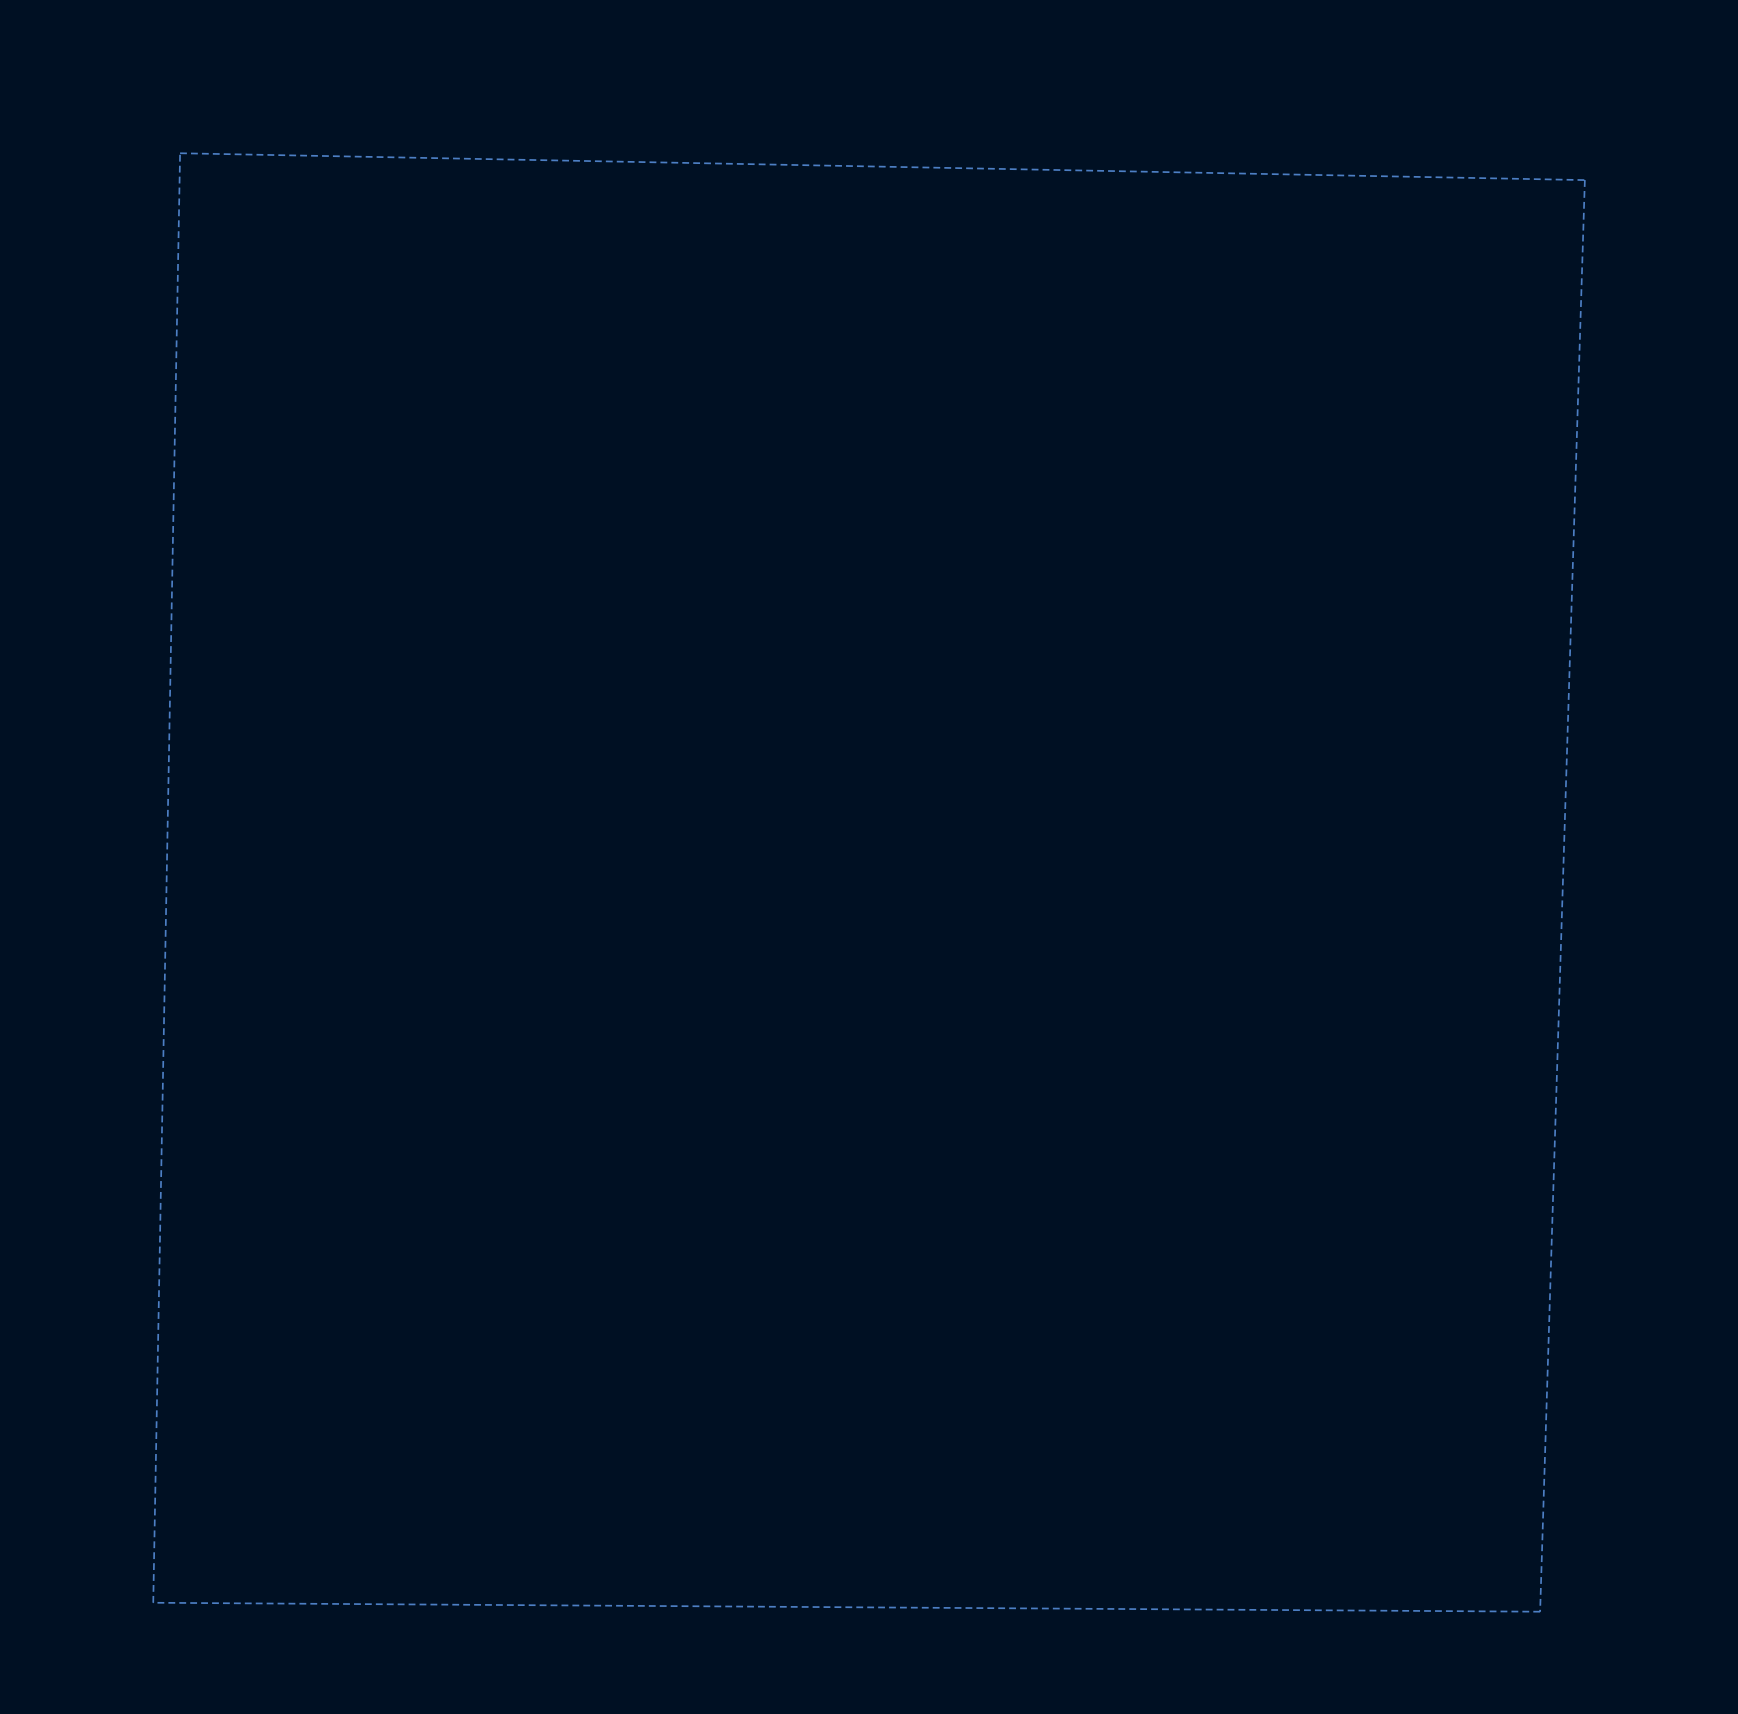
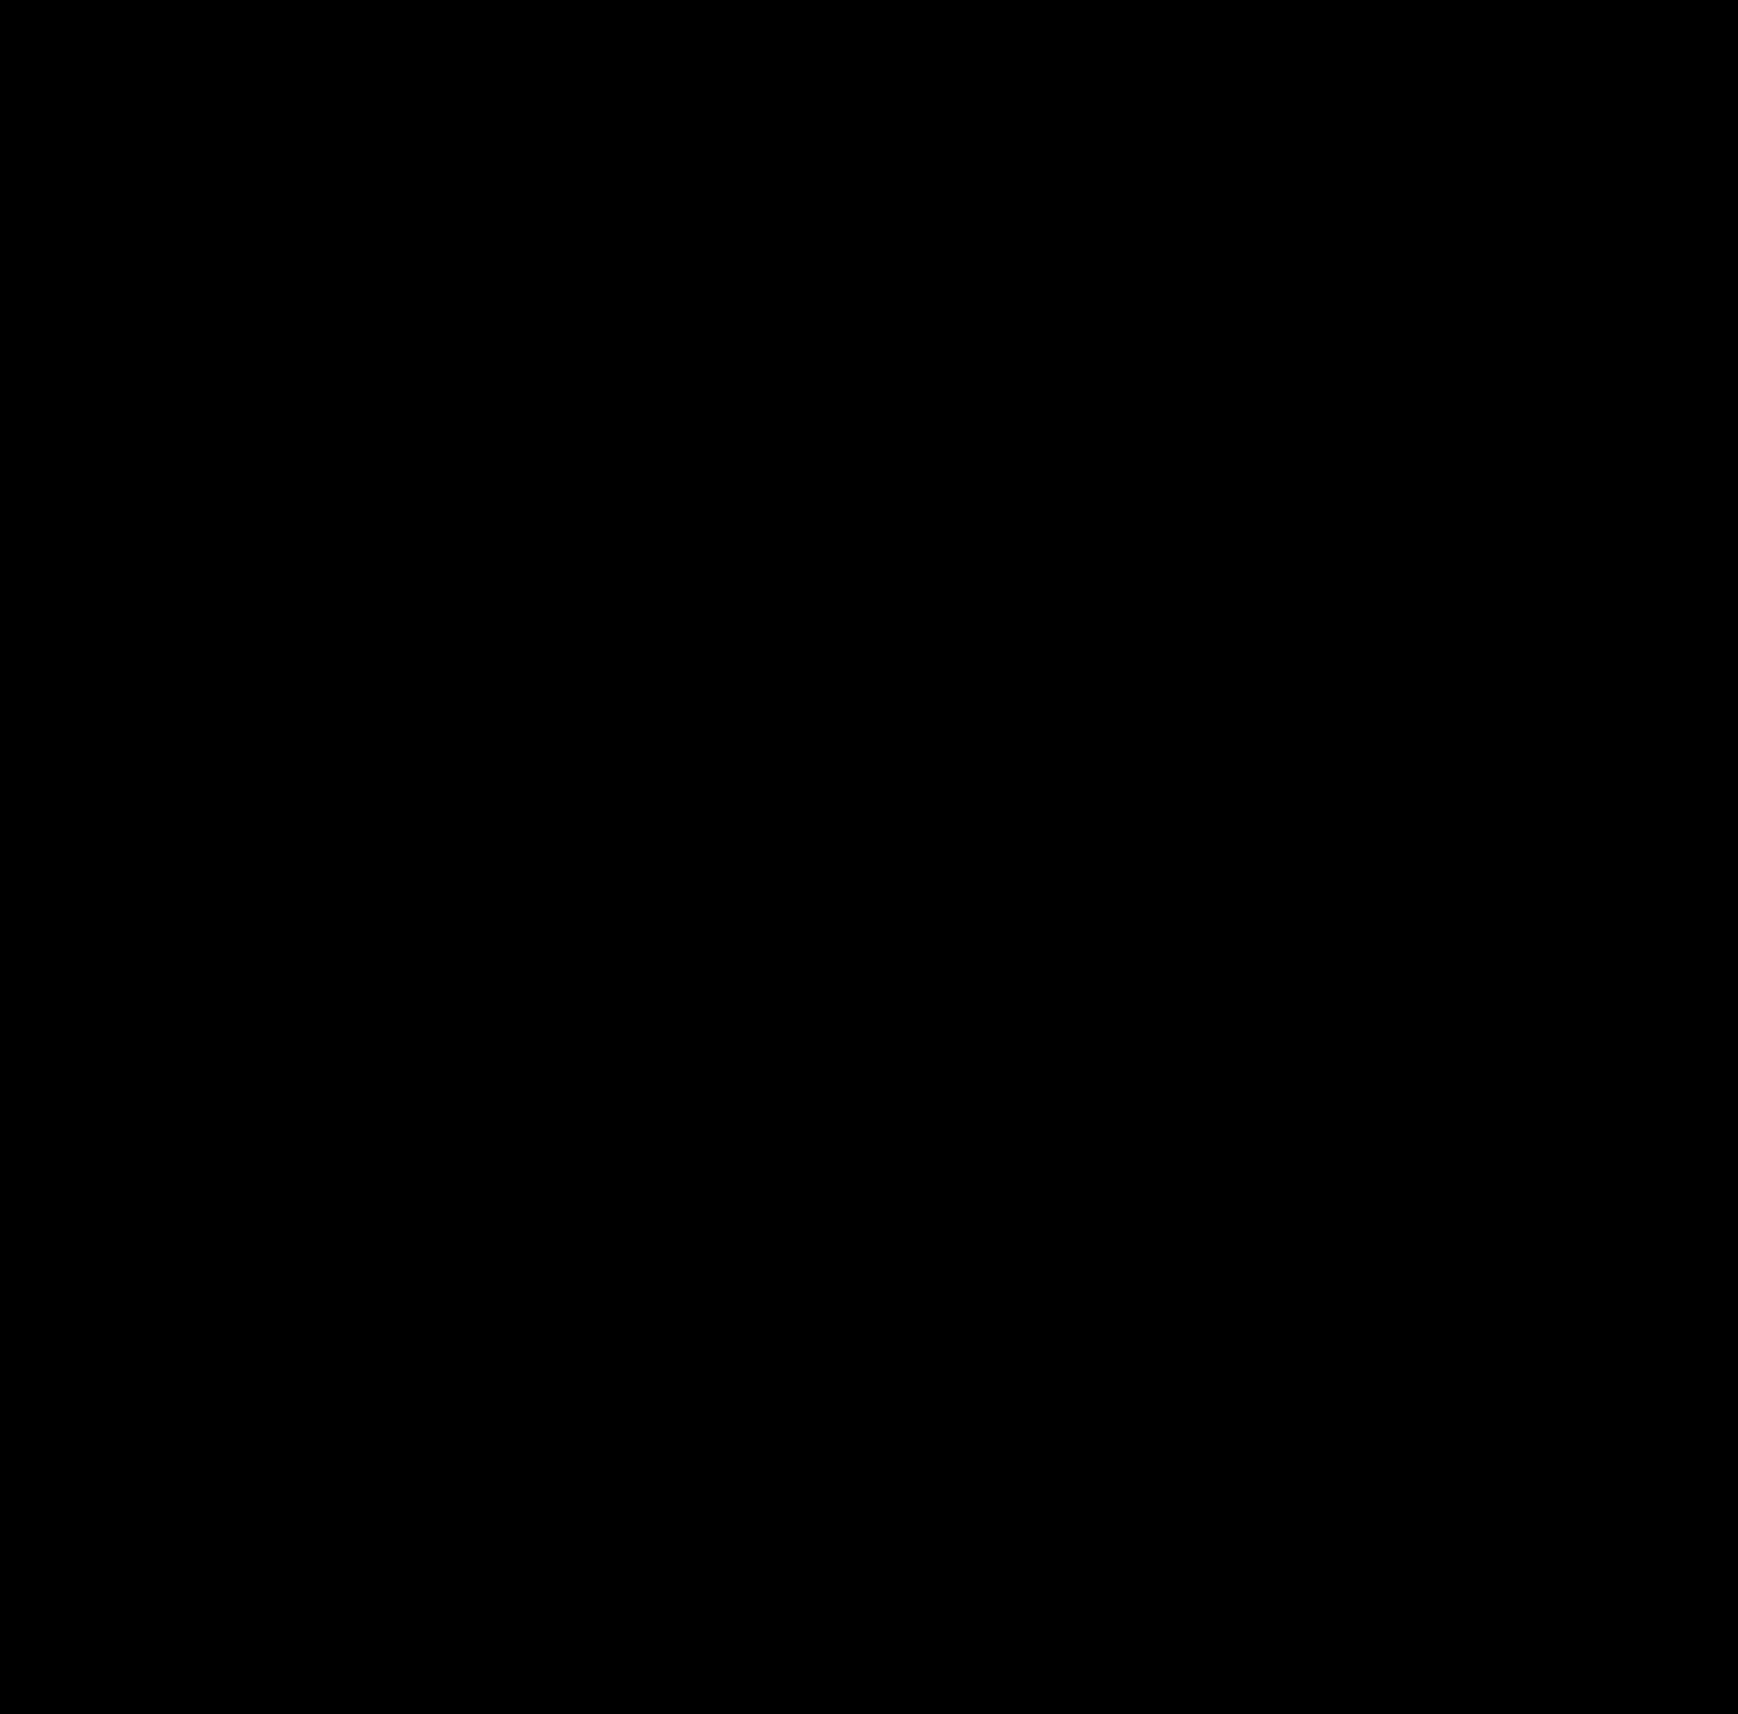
bottom zone outline: (180, 153) (153, 1602) (1540, 1611) (1584, 180) (180, 153) -> none

